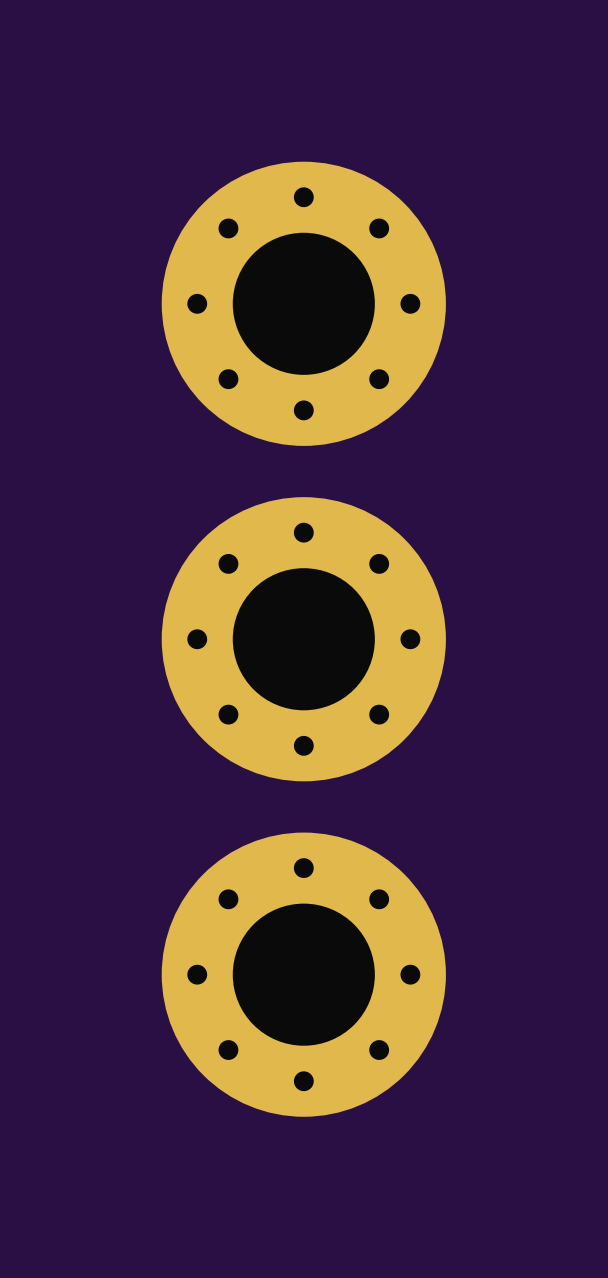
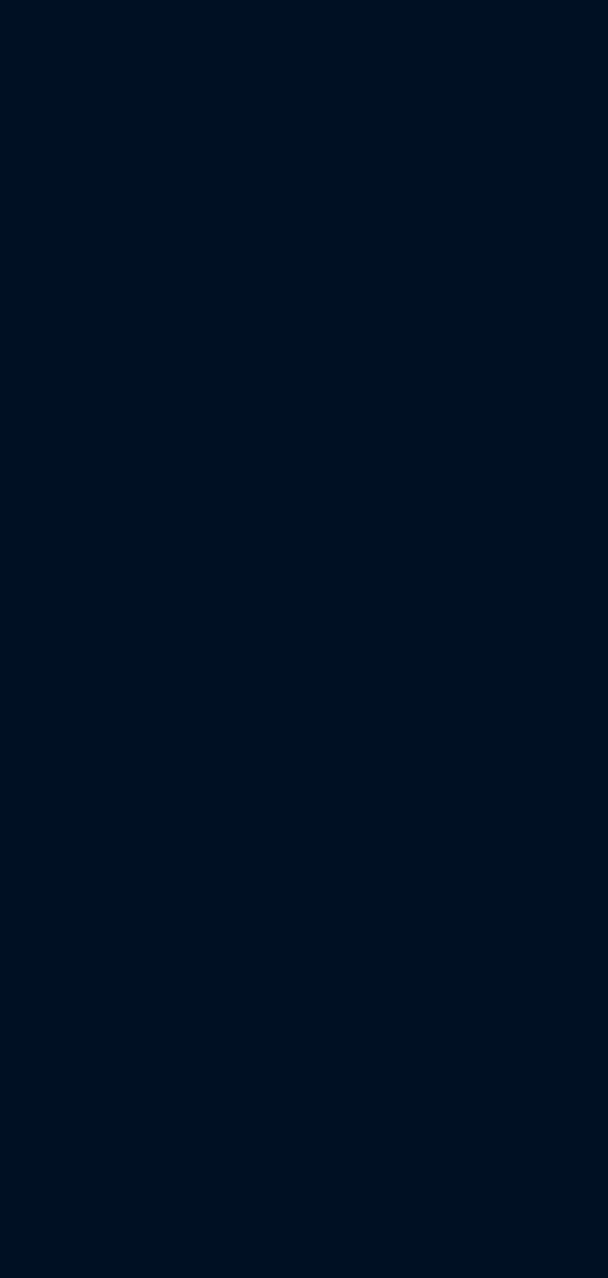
part: (303, 303) -> none
part: (303, 639) -> none
part: (303, 974) -> none

